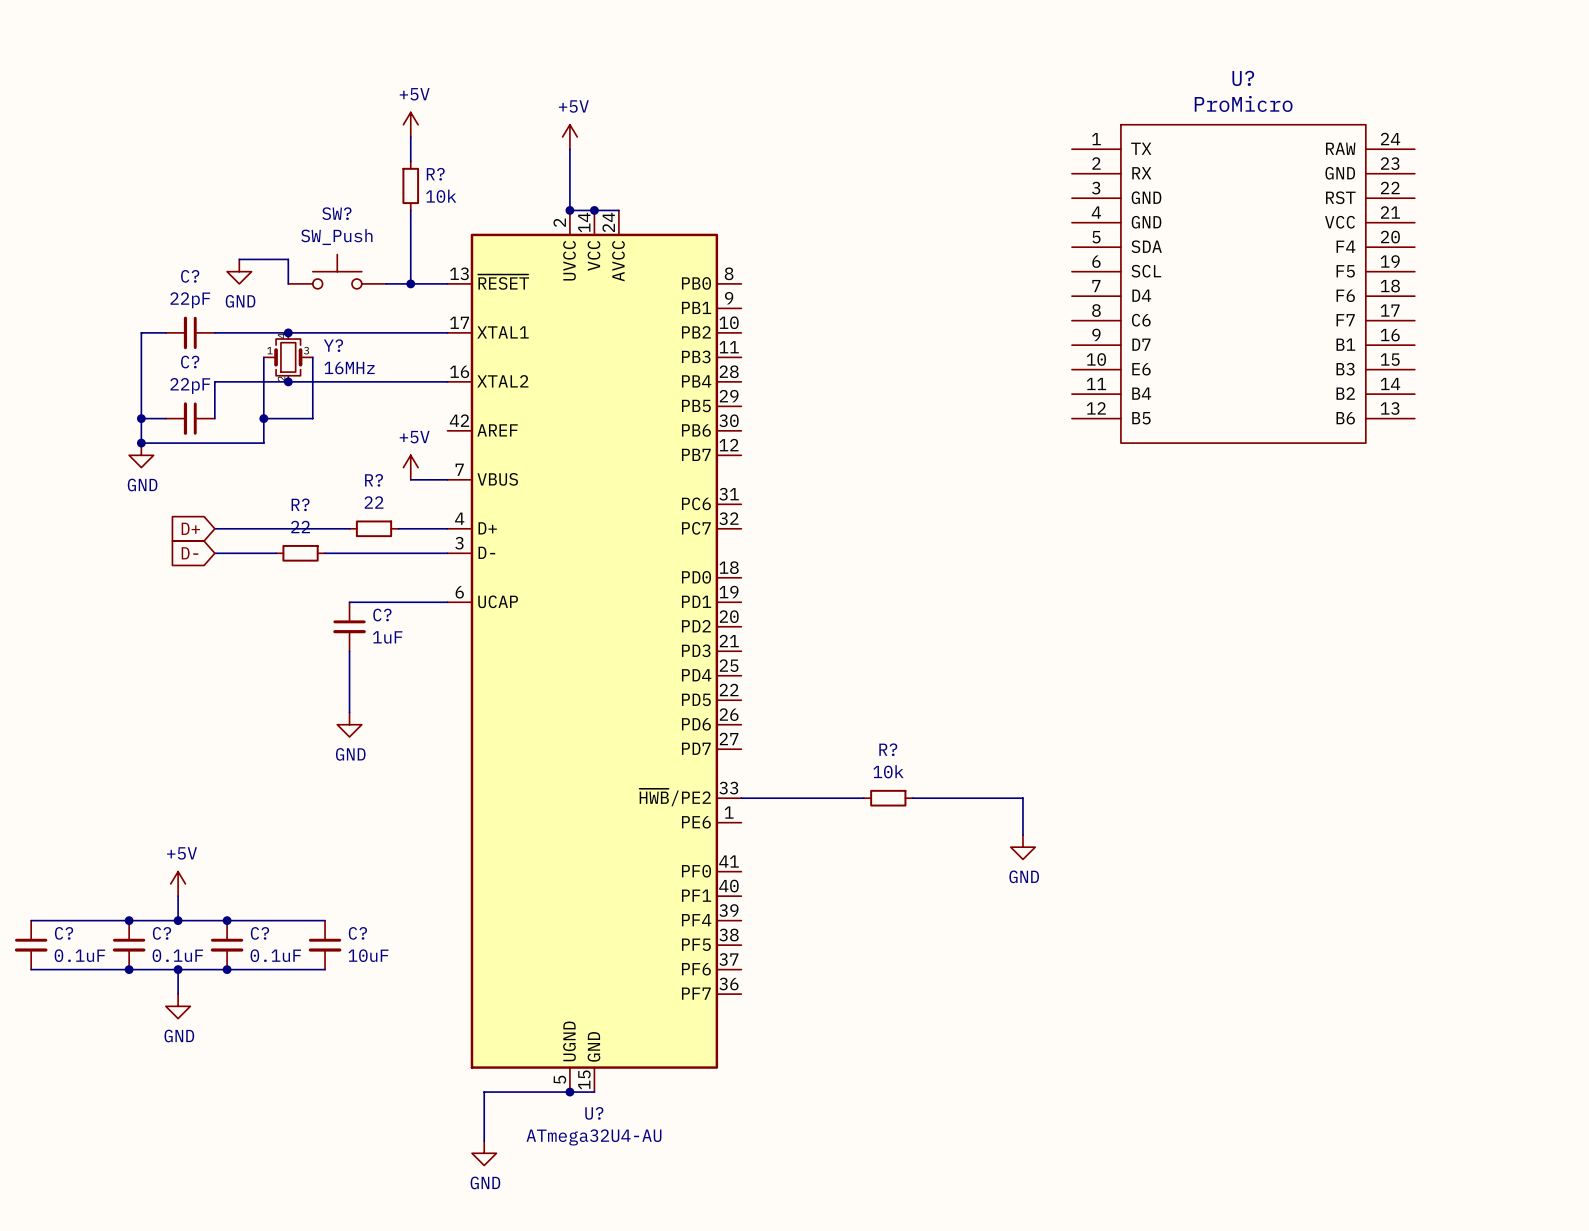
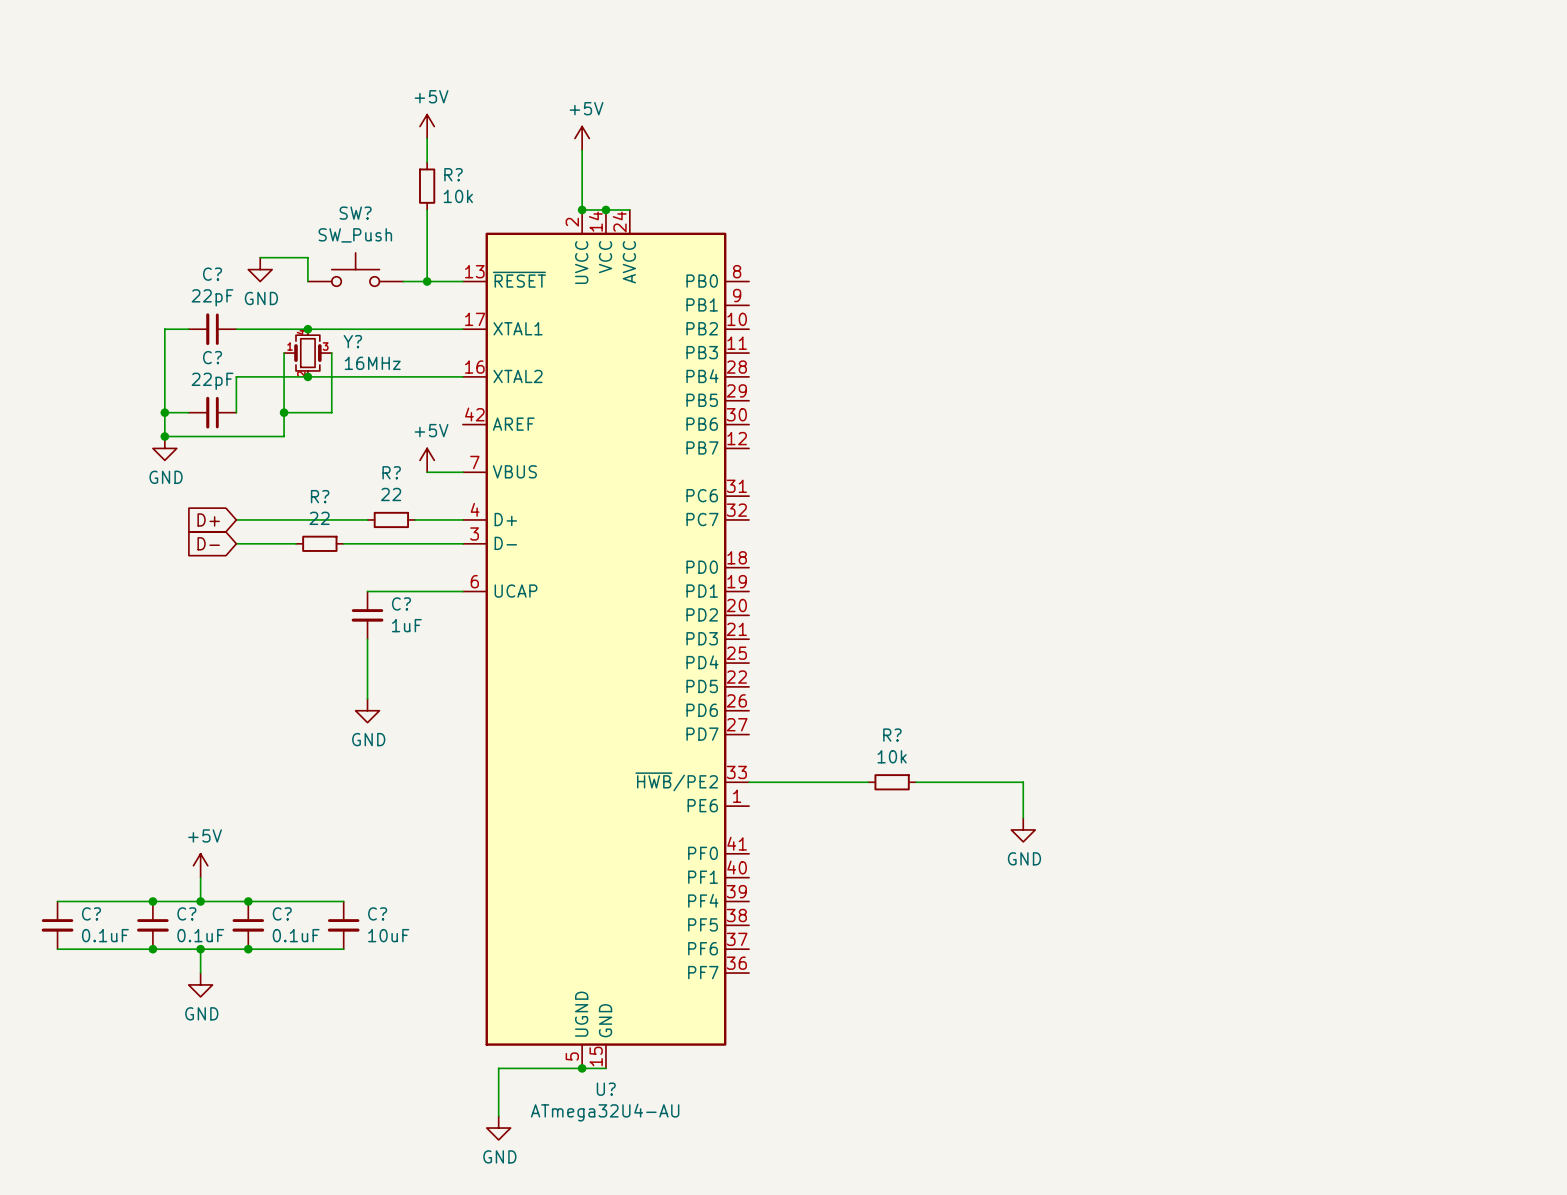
U?: ProMicro (1243, 283) -> none

